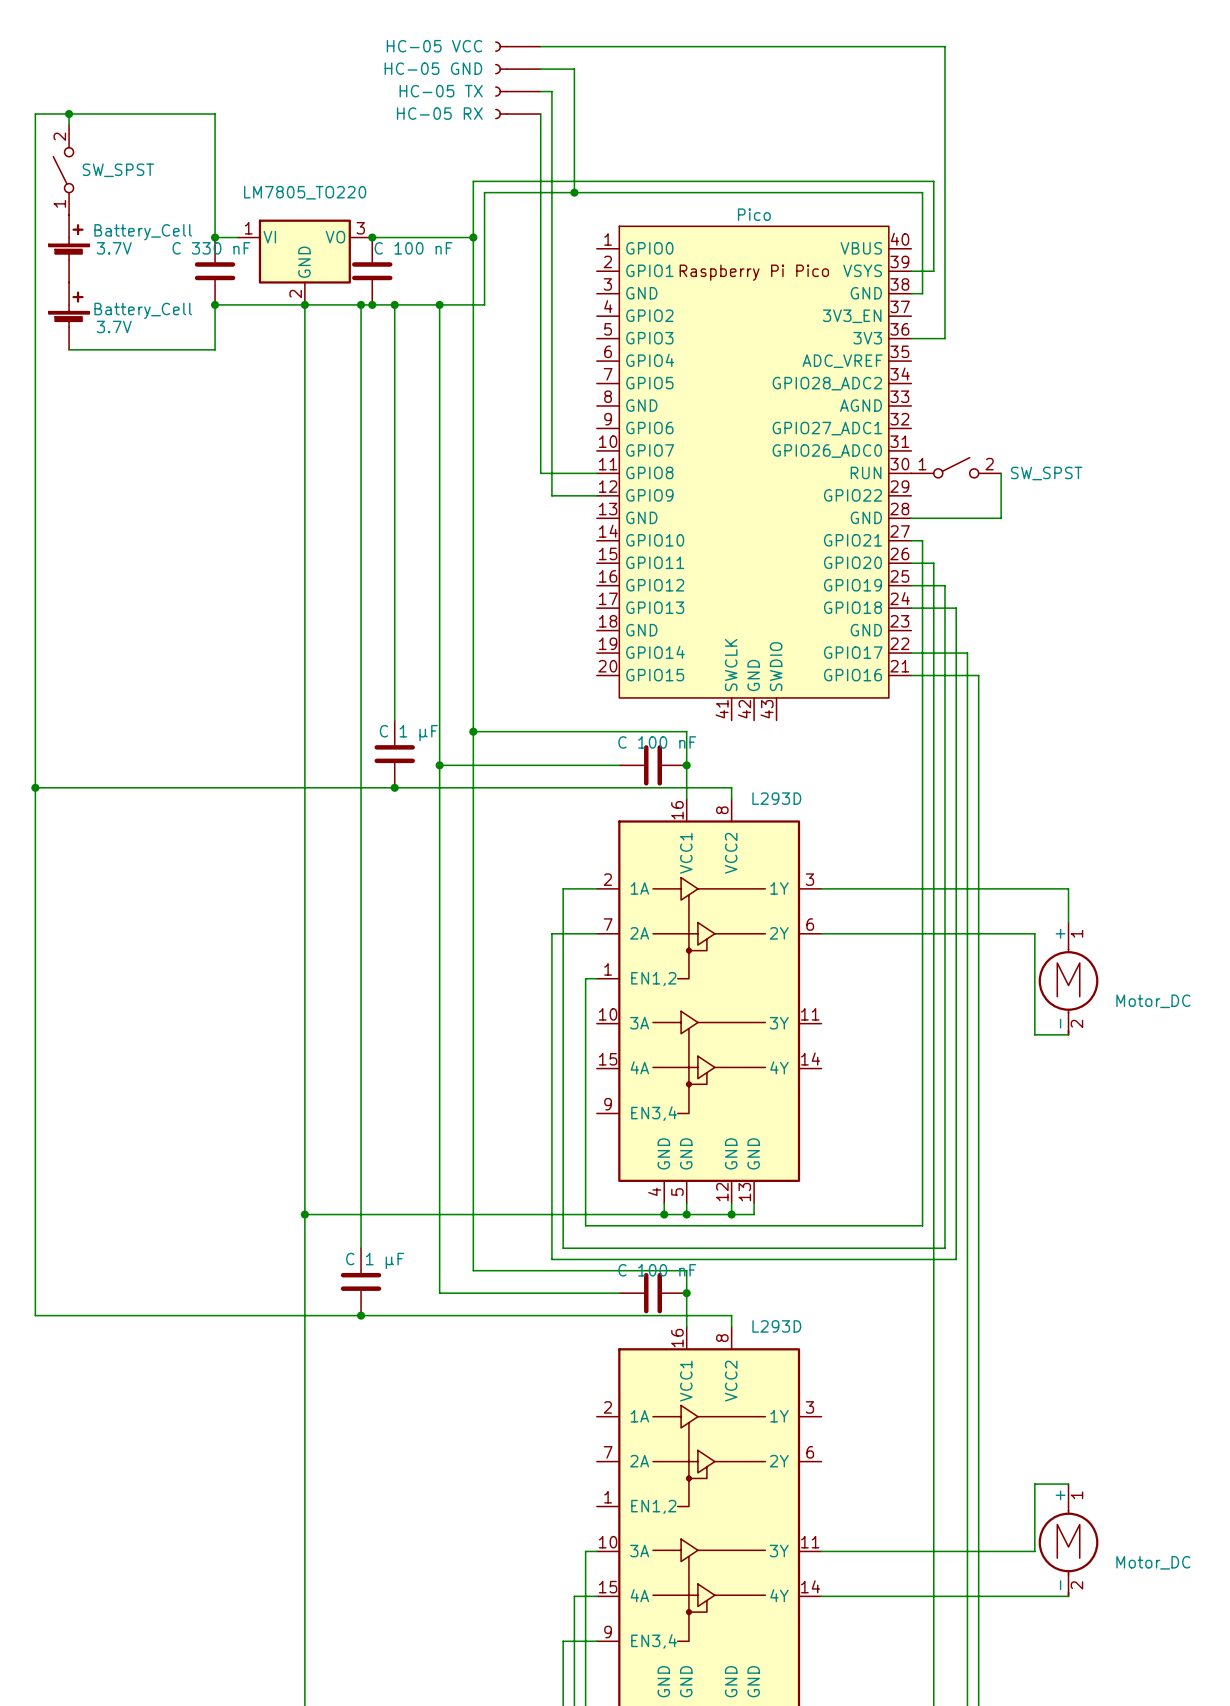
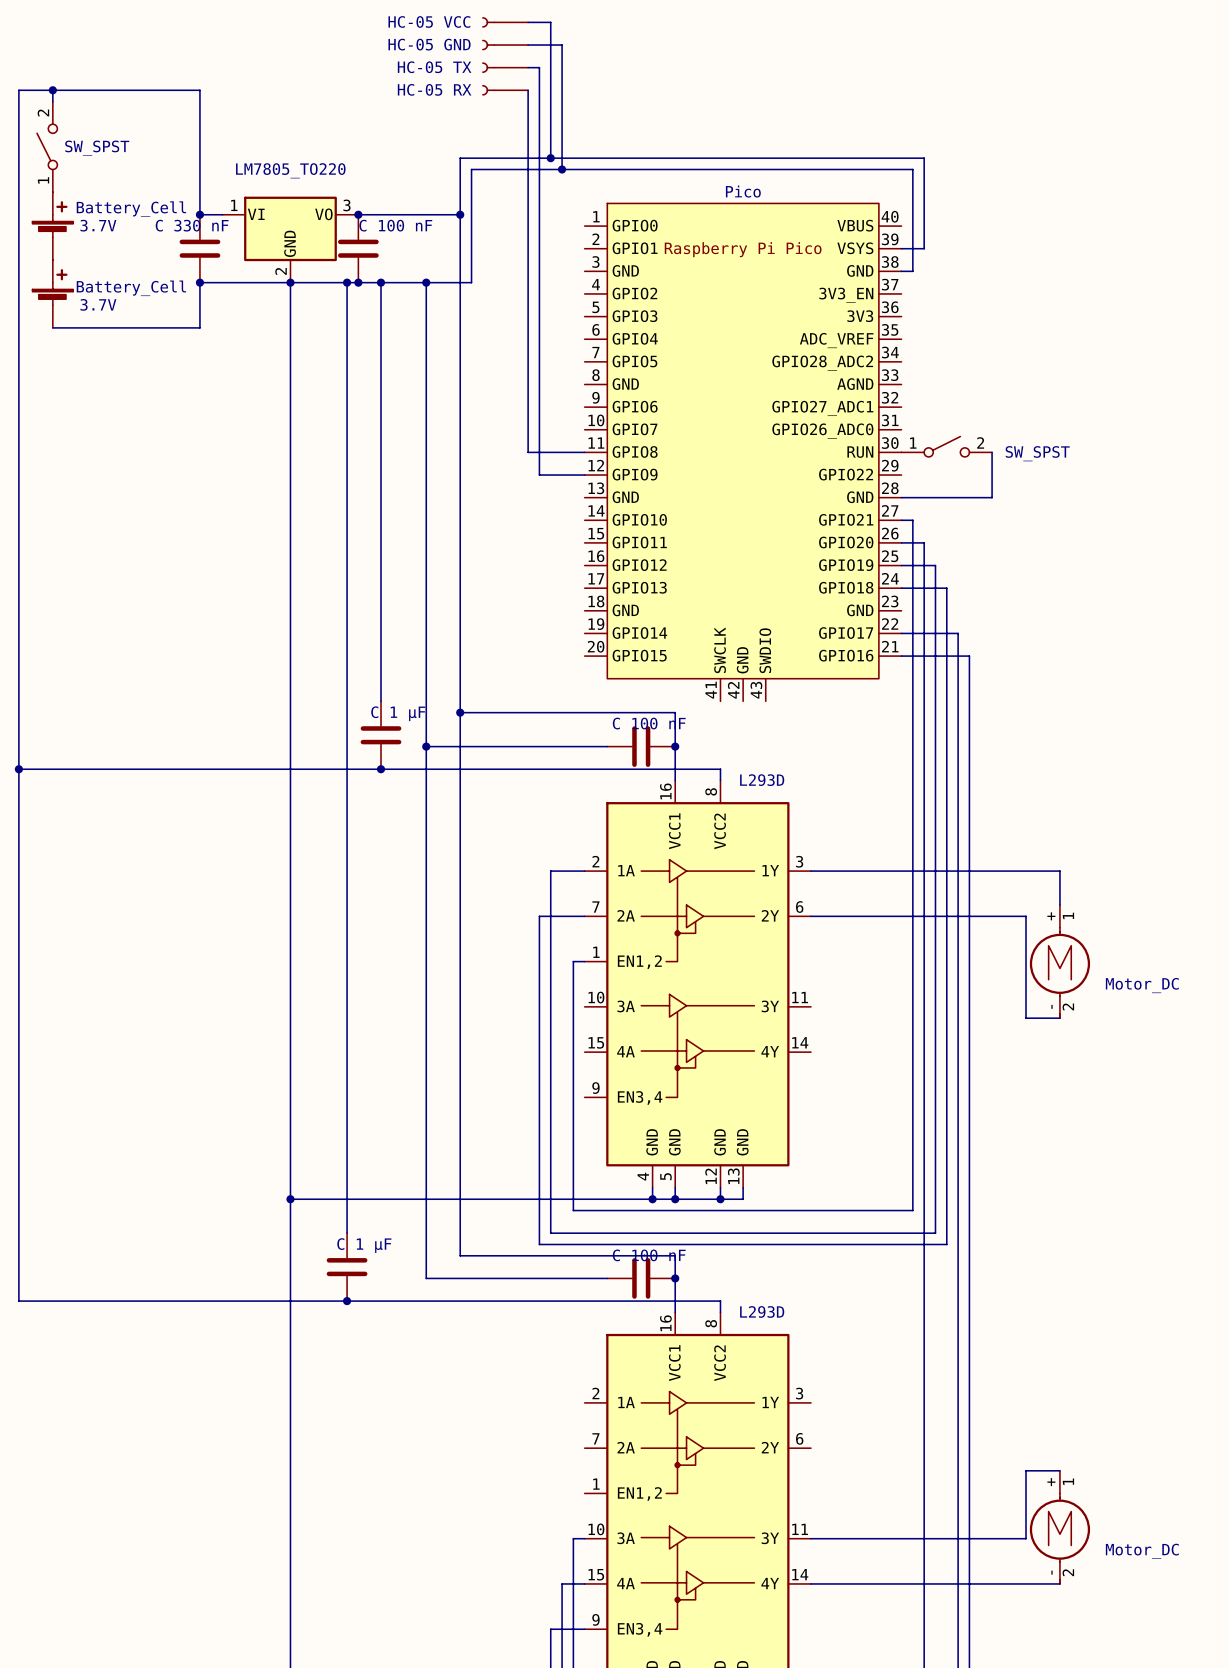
wire: (563, 46) (944, 46) (944, 338) (911, 338) -> (550, 22) (550, 158)
junction: none -> (550, 158)

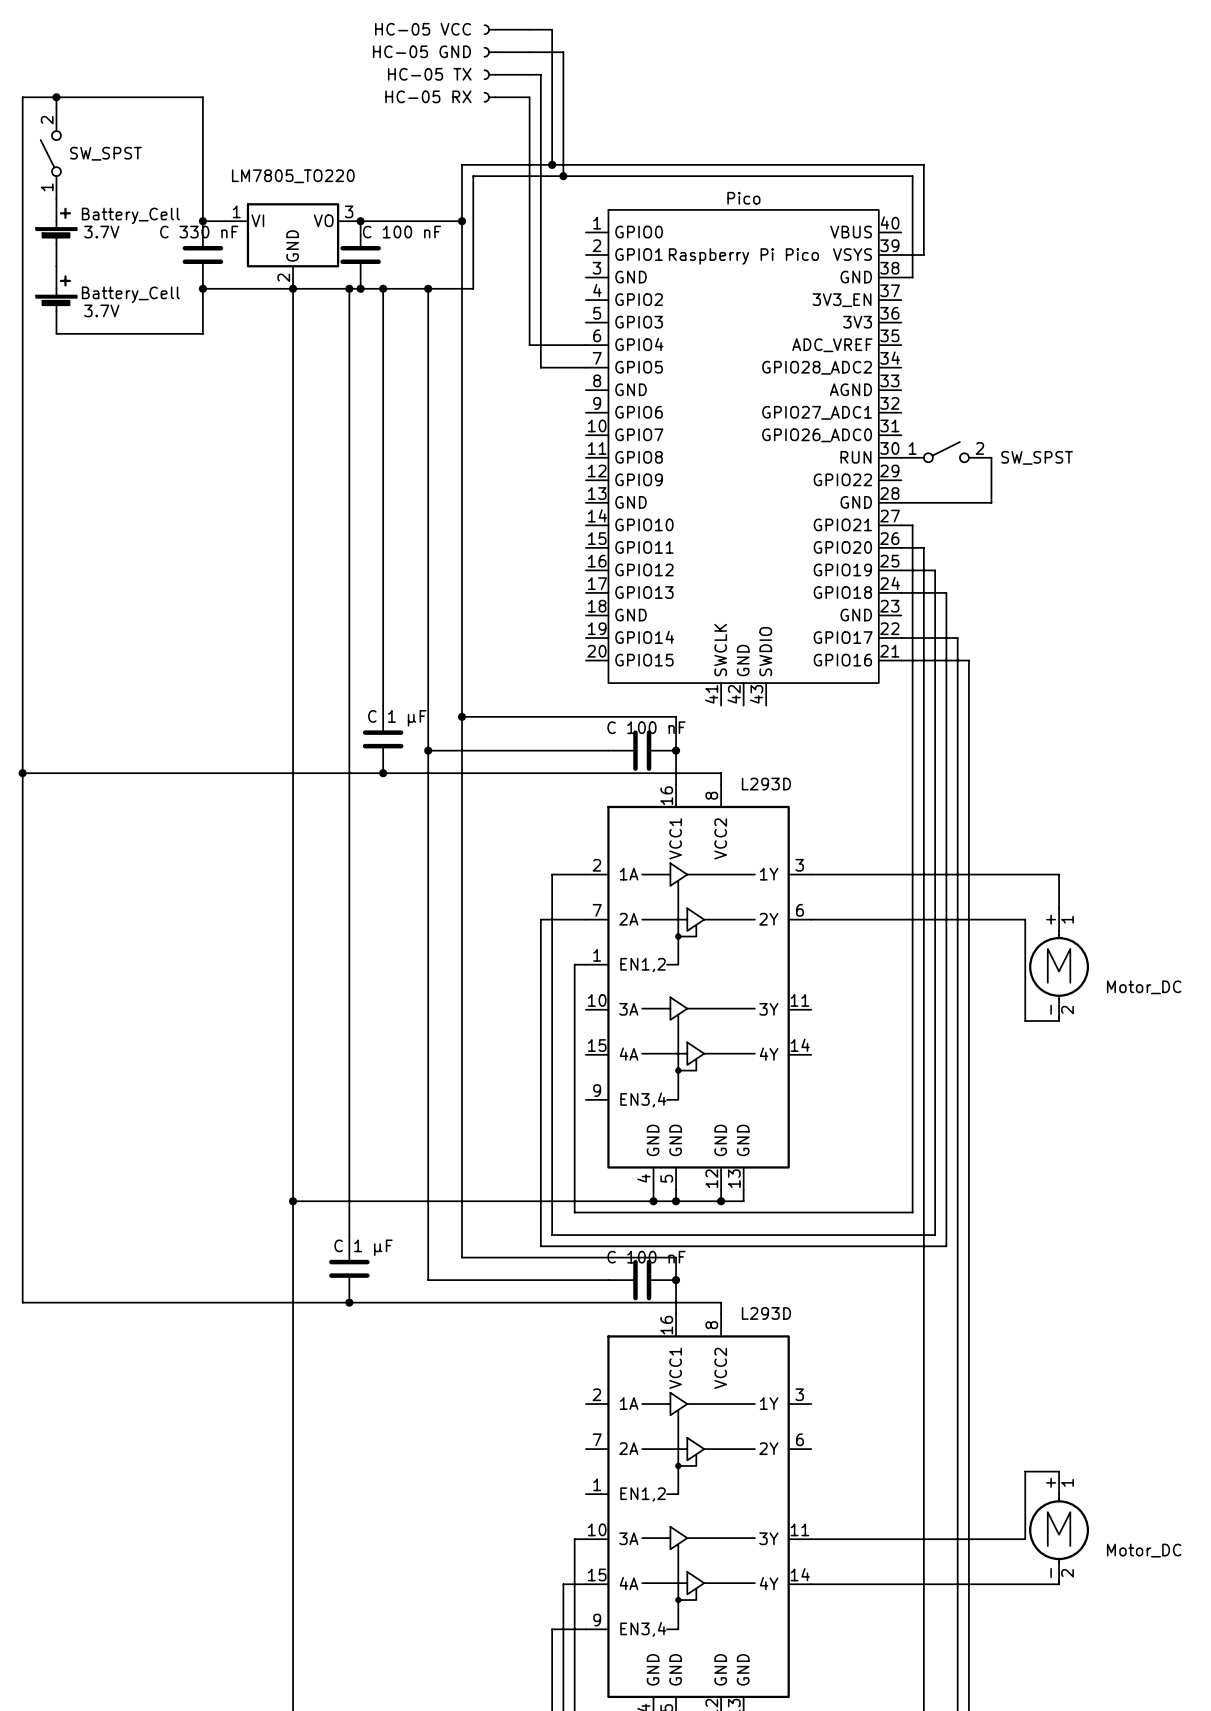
wire: (528, 339) (528, 452) (584, 452) -> (529, 345) (585, 345)
wire: (539, 361) (539, 475) (584, 475) -> (540, 367) (585, 367)

